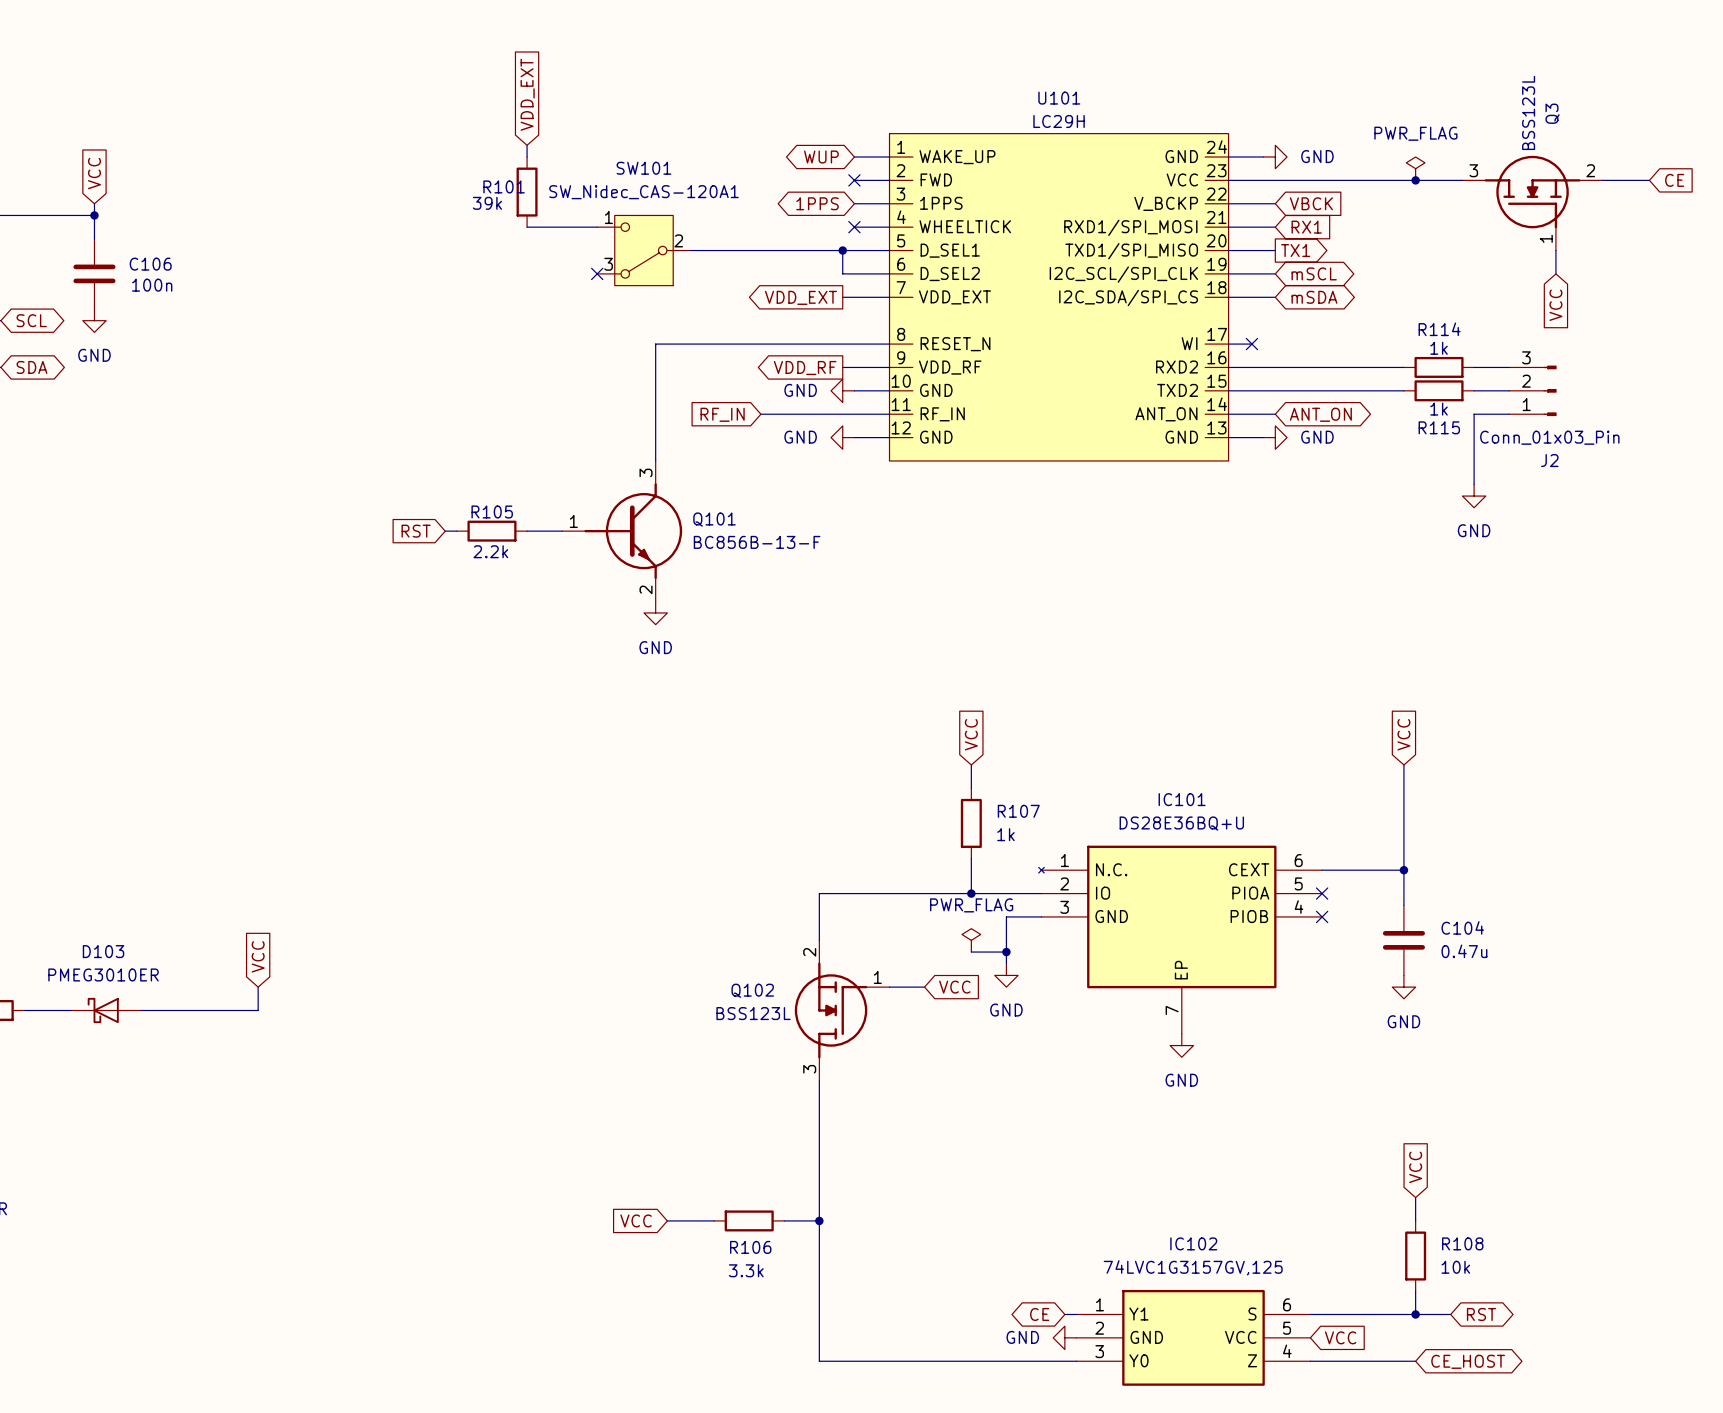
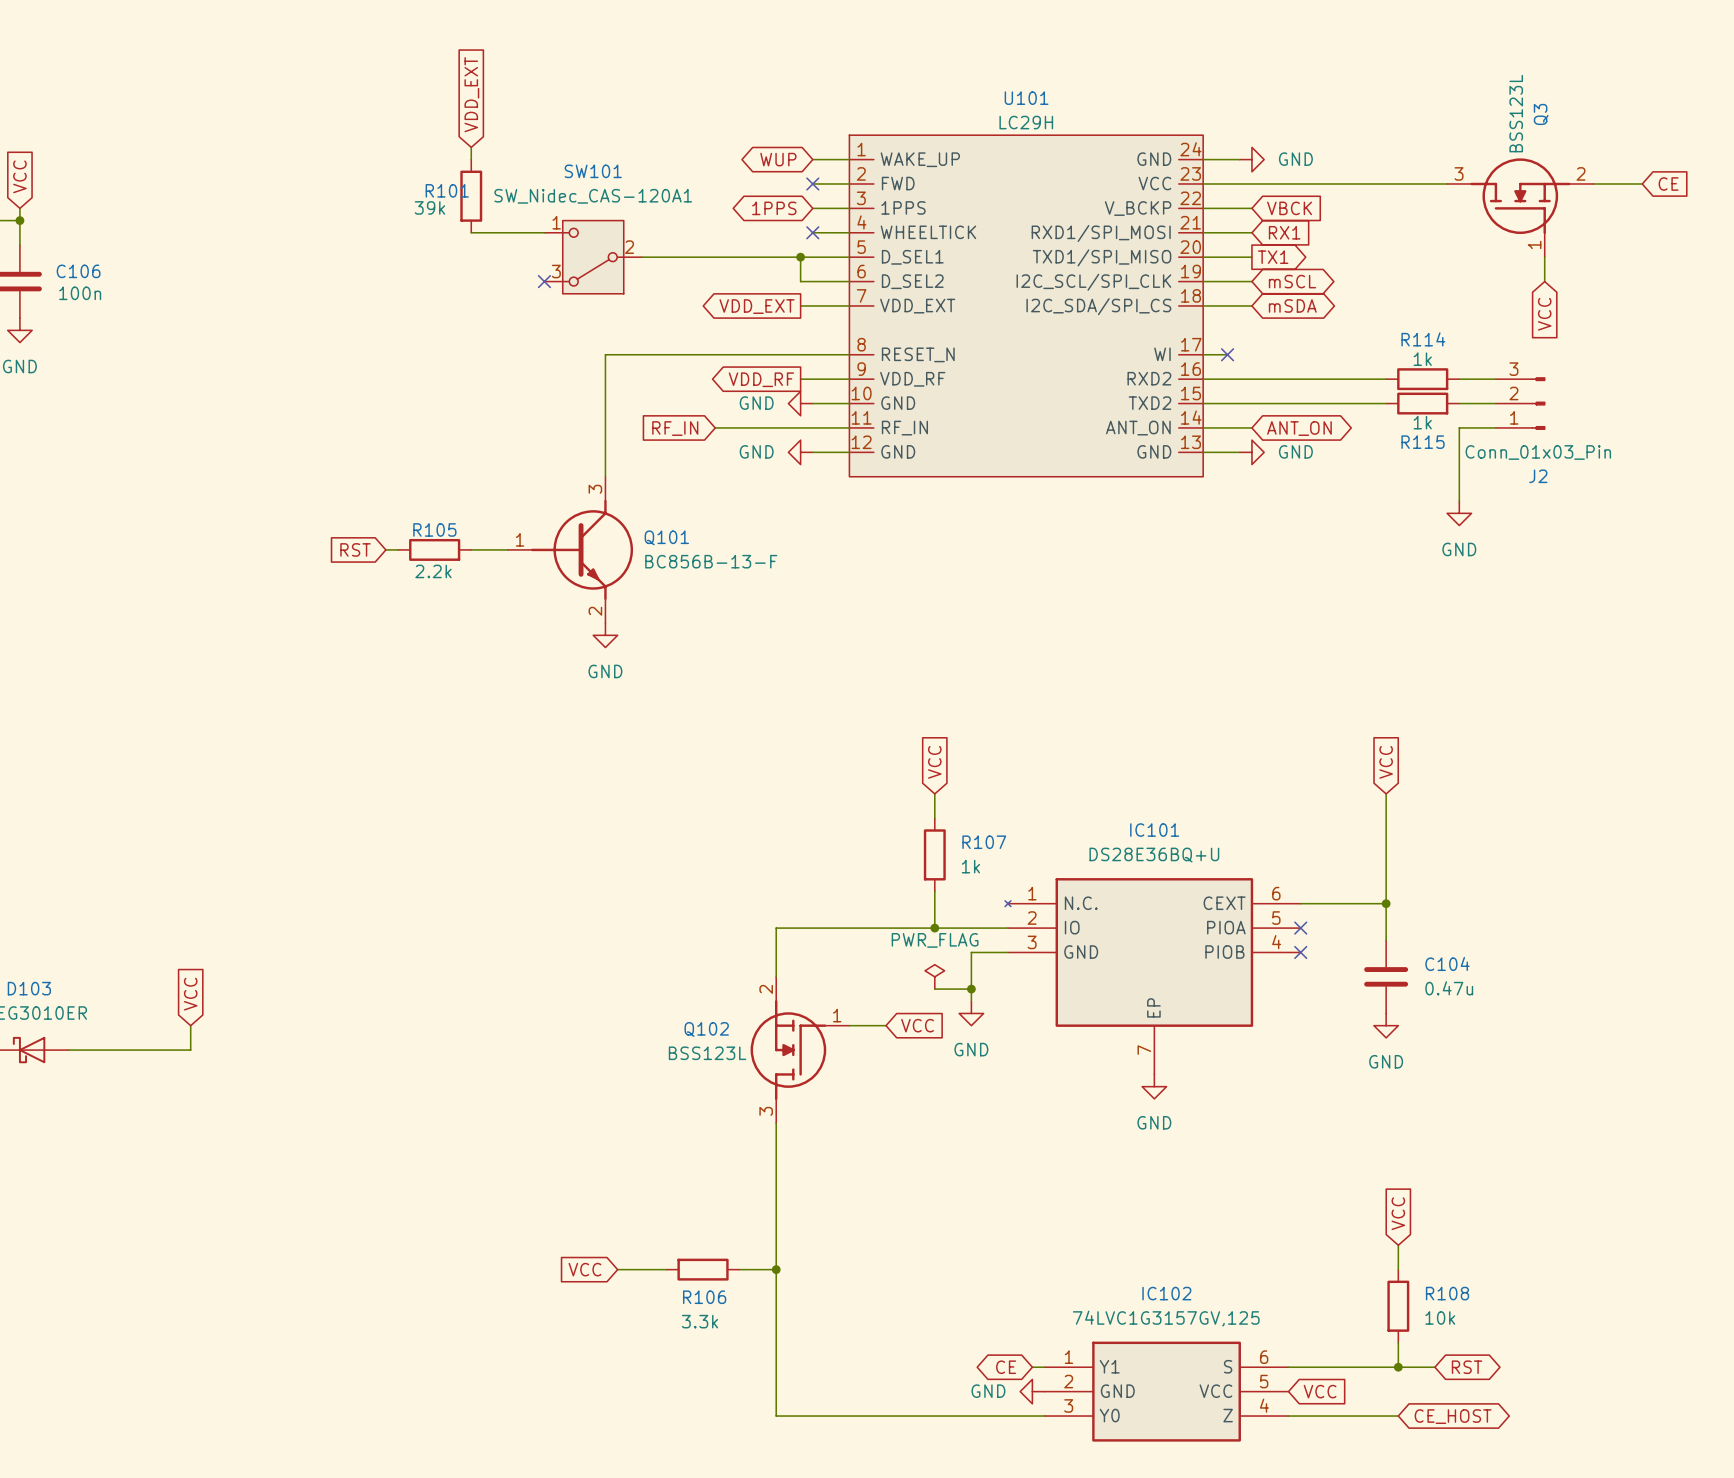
power symbol: PWR_FLAG (1415, 168) -> none
junction: (1415, 180) -> none

